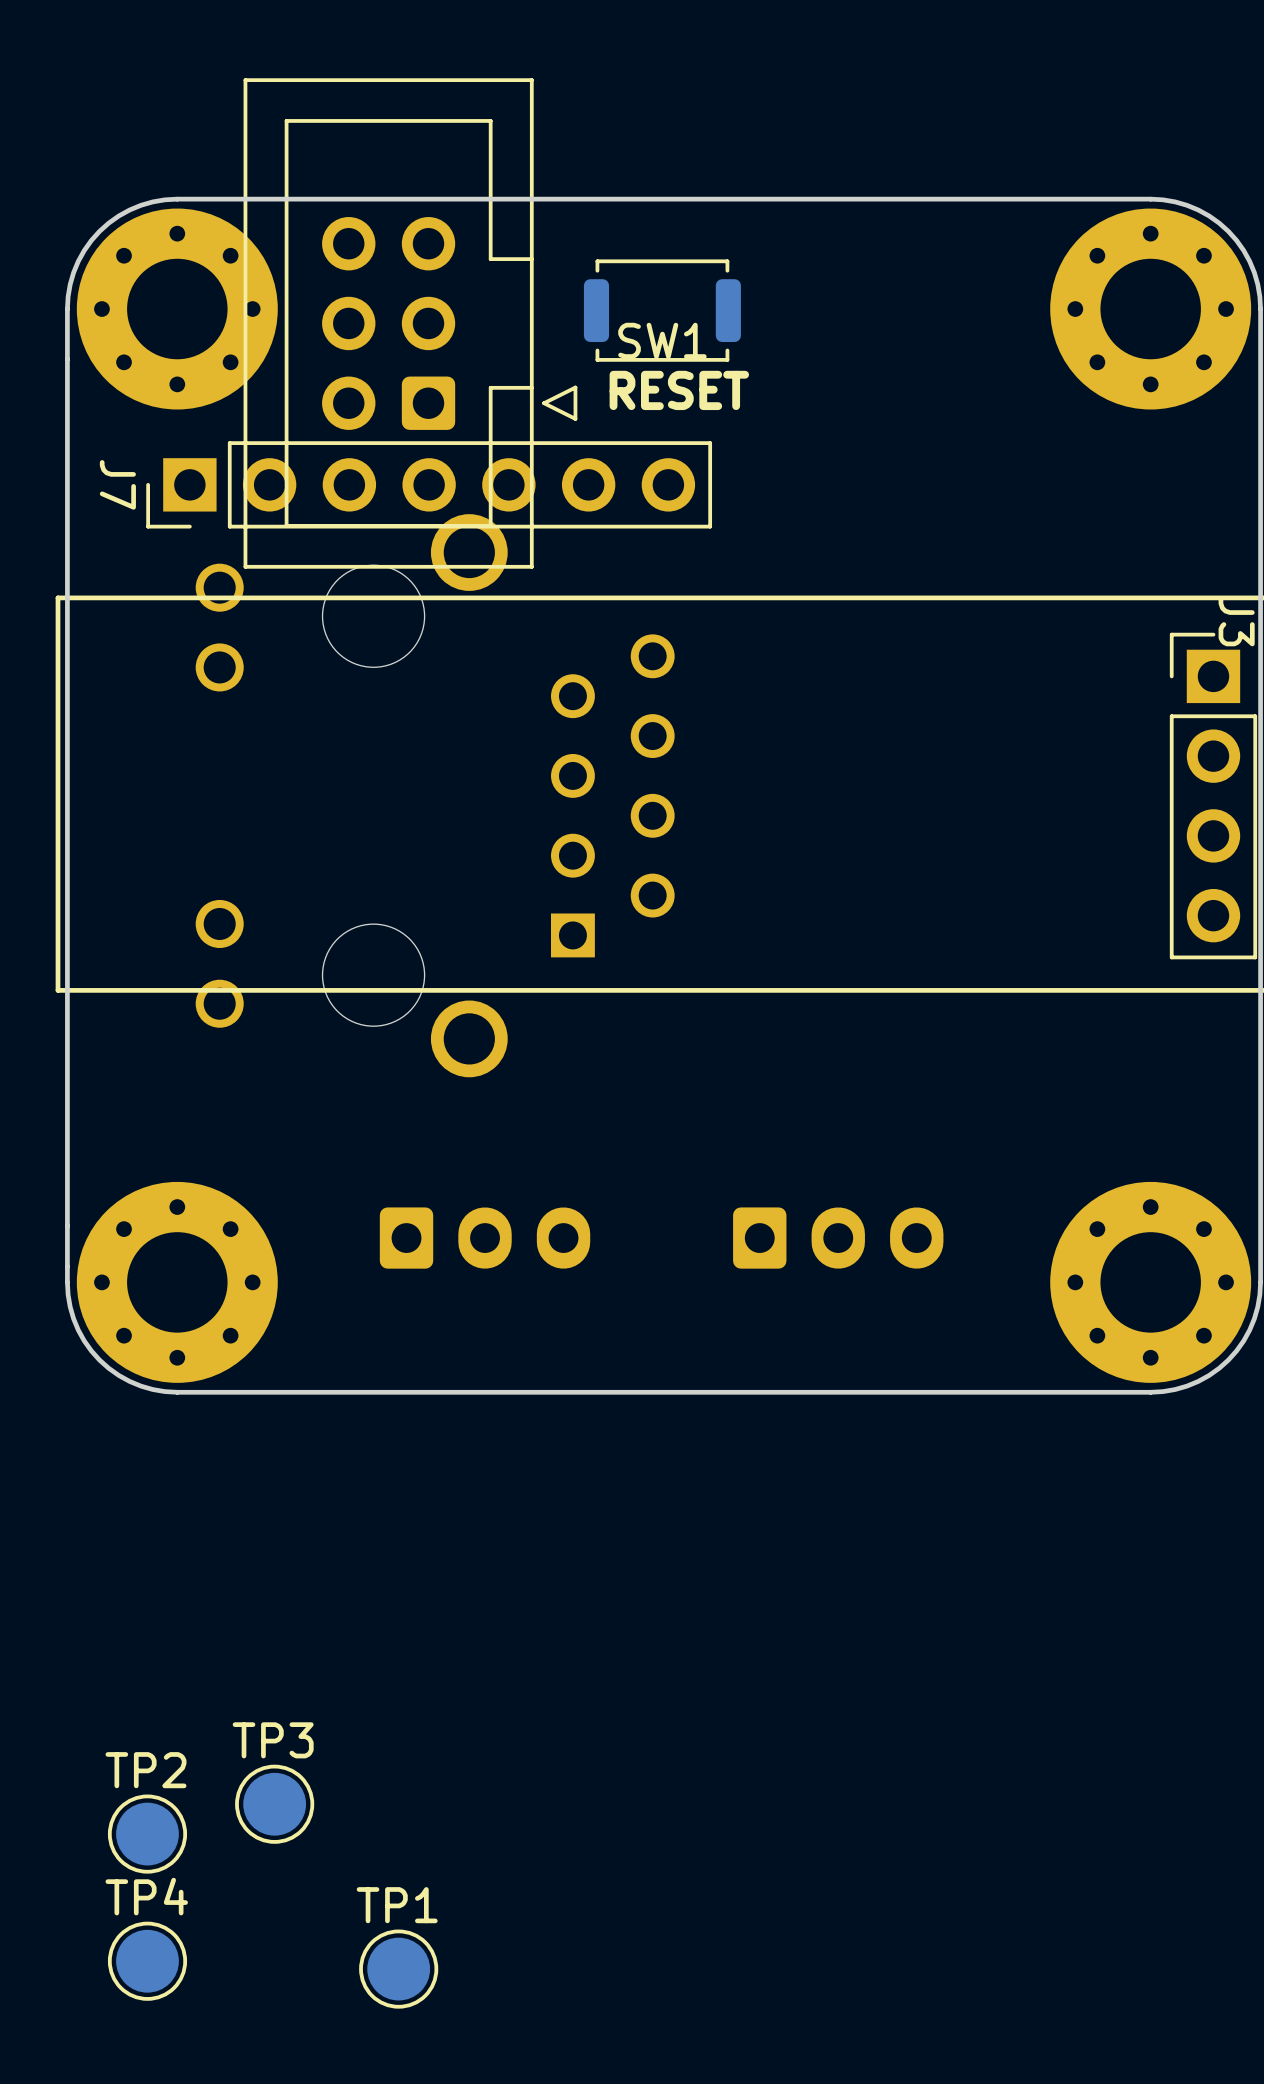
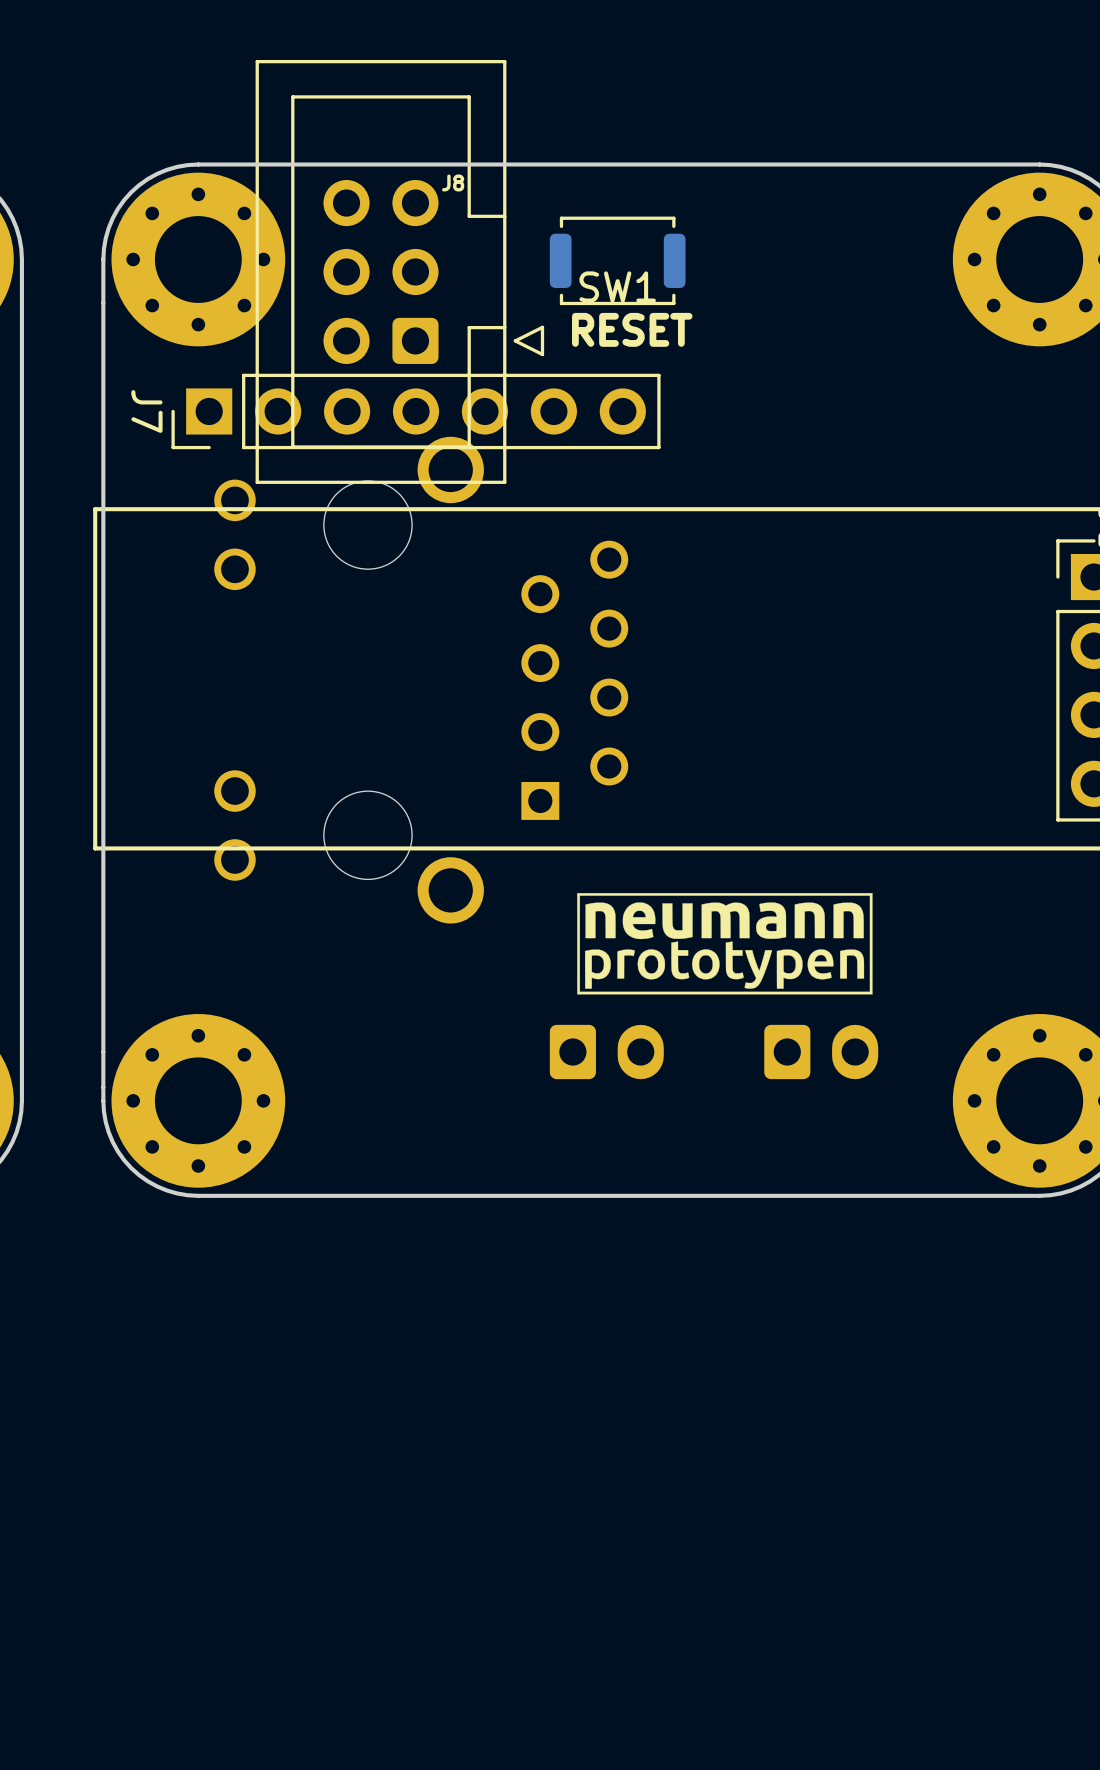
J8 name: none -> J8 (453, 182)
drawing: none -> [577, 893, 873, 995]
part: none -> (606, 1052)
part: none -> (821, 1052)
part: (485, 1238) -> none
part: (838, 1238) -> none
TP3: (274, 1804) -> none
TP2: (147, 1834) -> none
TP4: (147, 1961) -> none
TP1: (398, 1969) -> none

